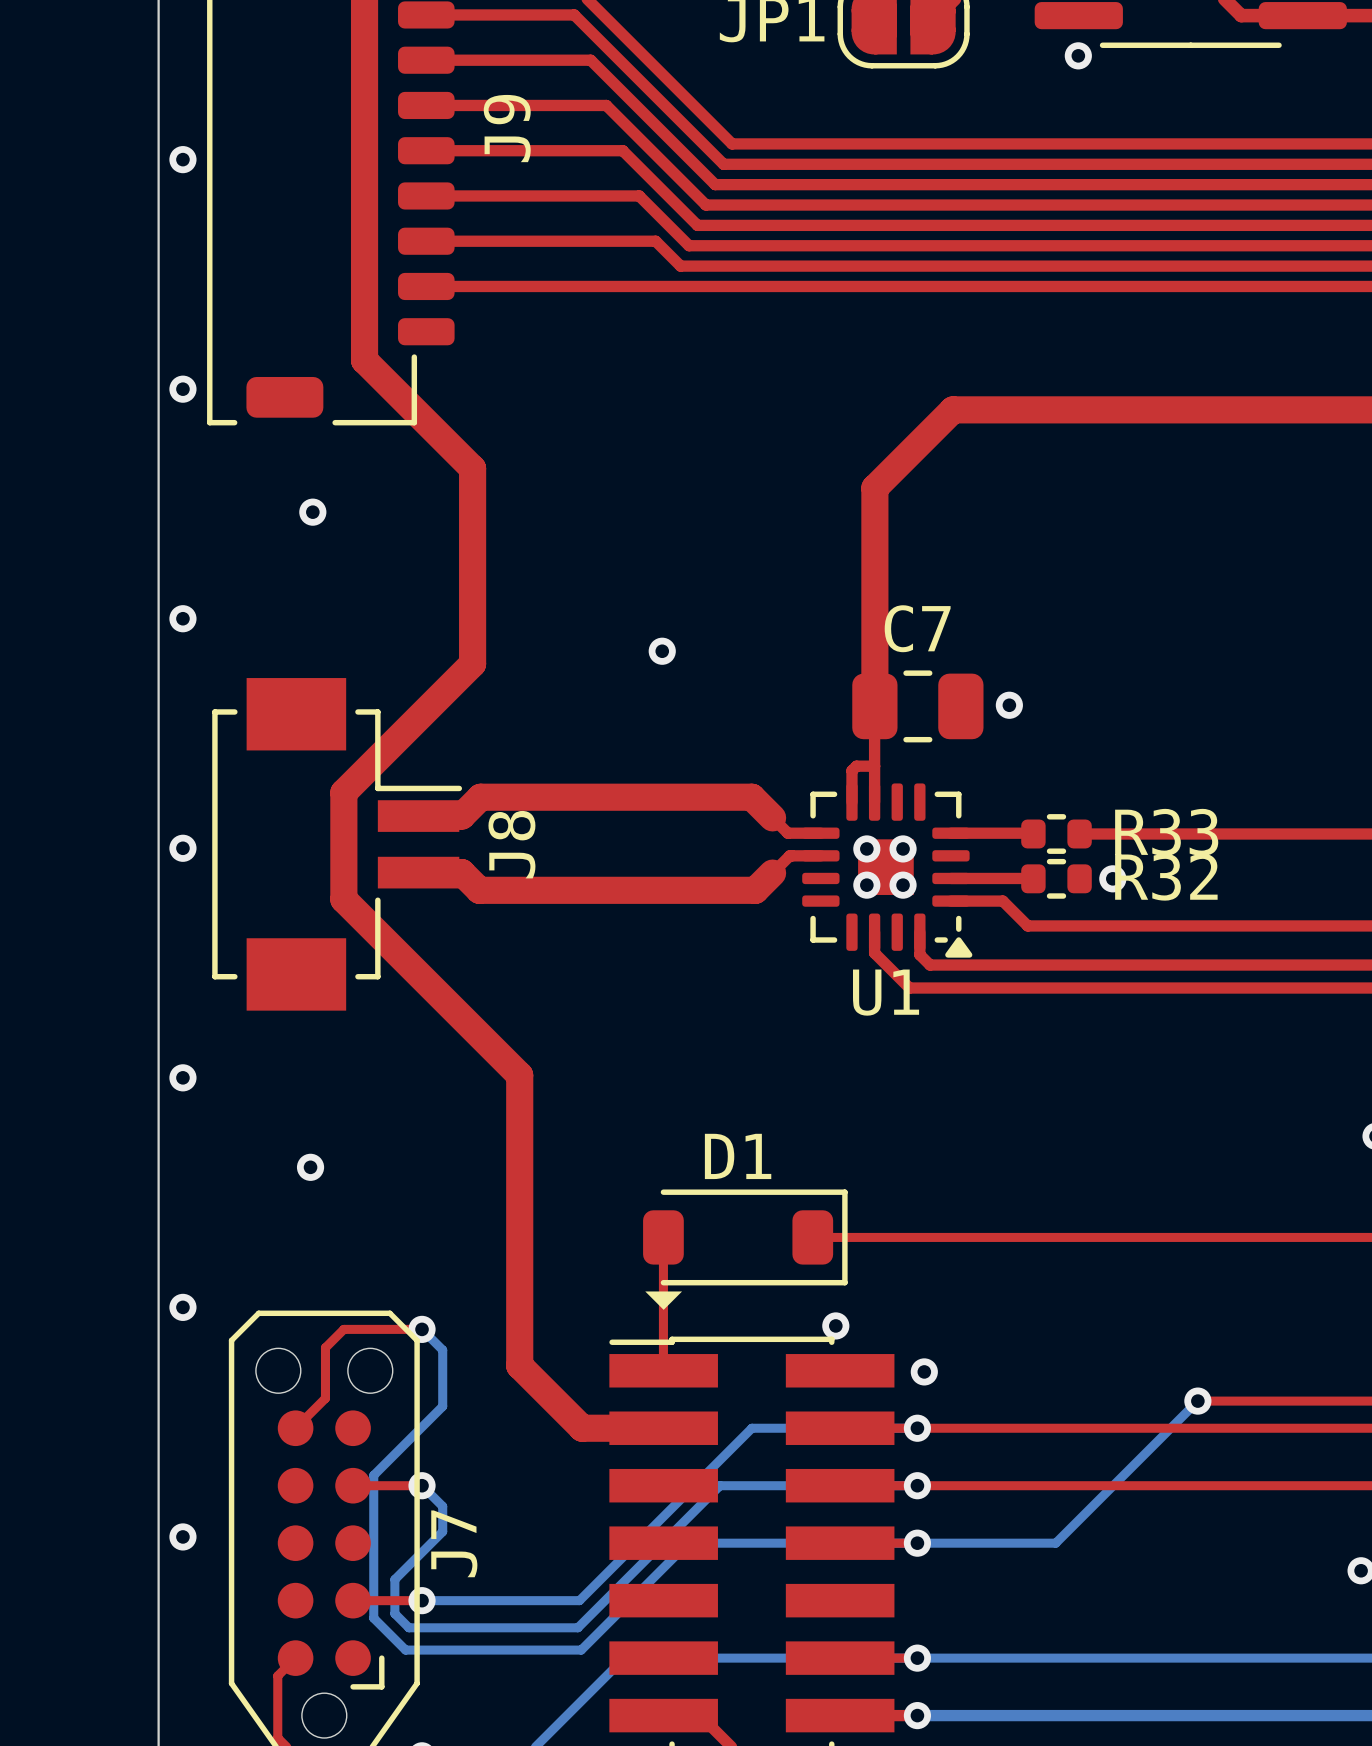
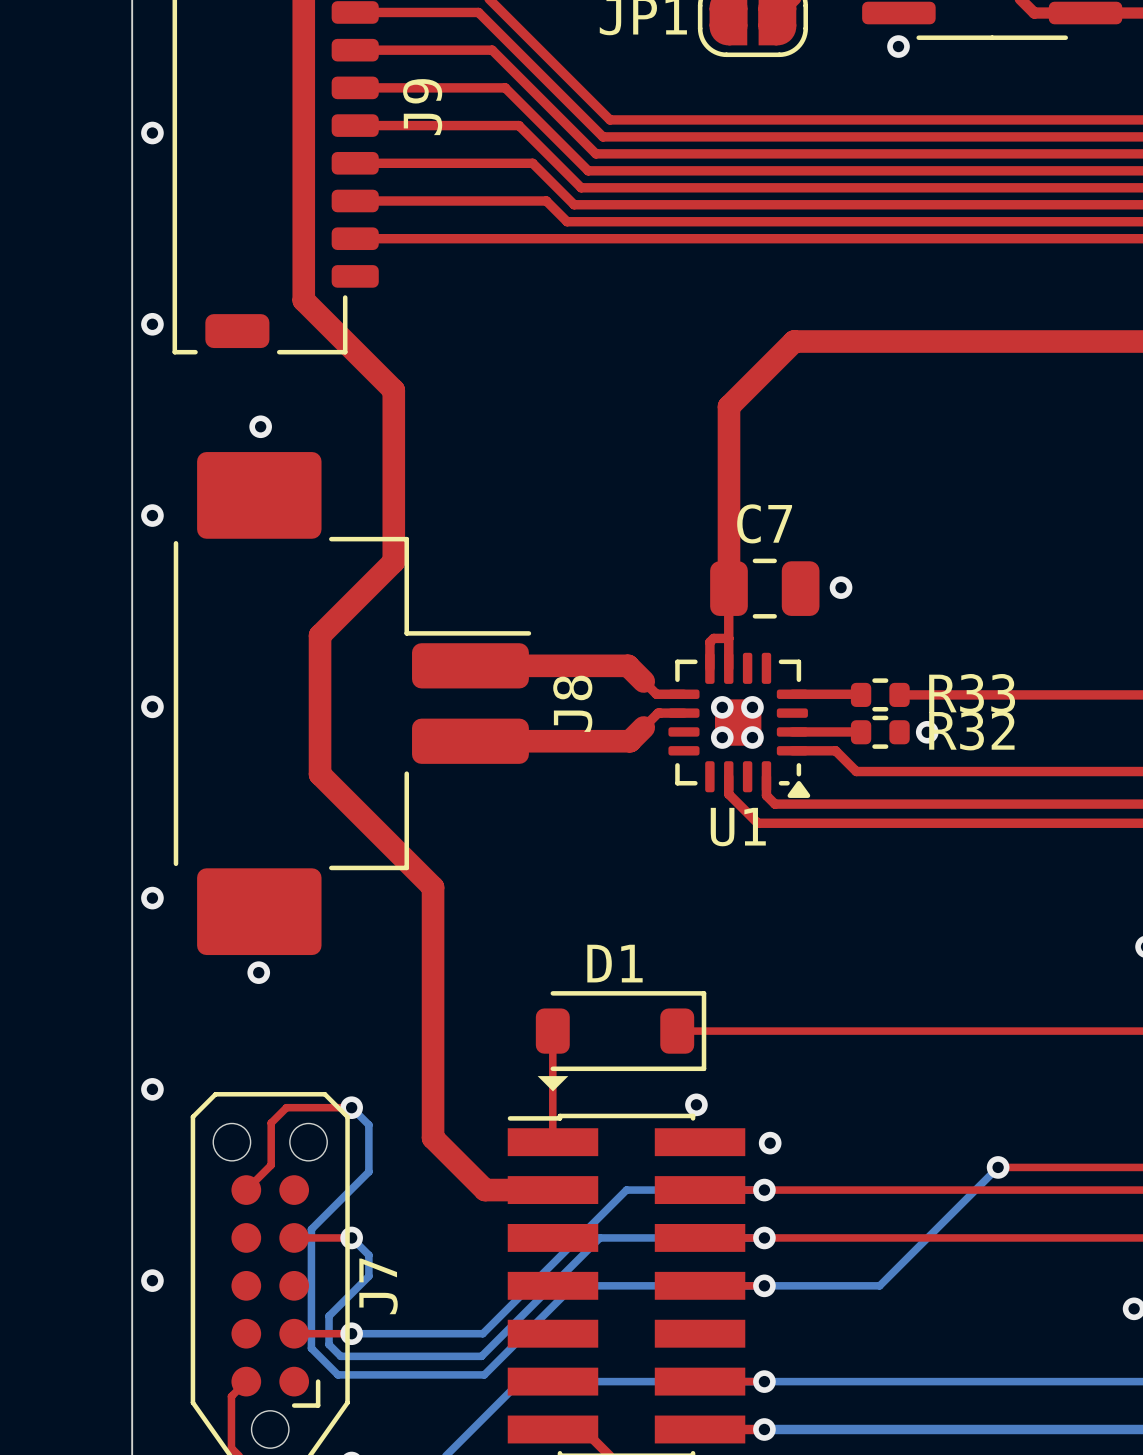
via: (662, 651) -> none
top track: (472, 663) (343, 792) (343, 899) (519, 1075) -> (393, 553) (393, 561) (320, 635) (320, 774) (433, 887) (433, 896)
J8 footprint: [212, 678, 463, 1011] -> [173, 452, 532, 956]
top track: (753, 799) (751, 797) (480, 797) (461, 816) (418, 816) -> (628, 665) (470, 665)
top track: (418, 872) (461, 872) (479, 890) (756, 889) -> (470, 741) (629, 741)

